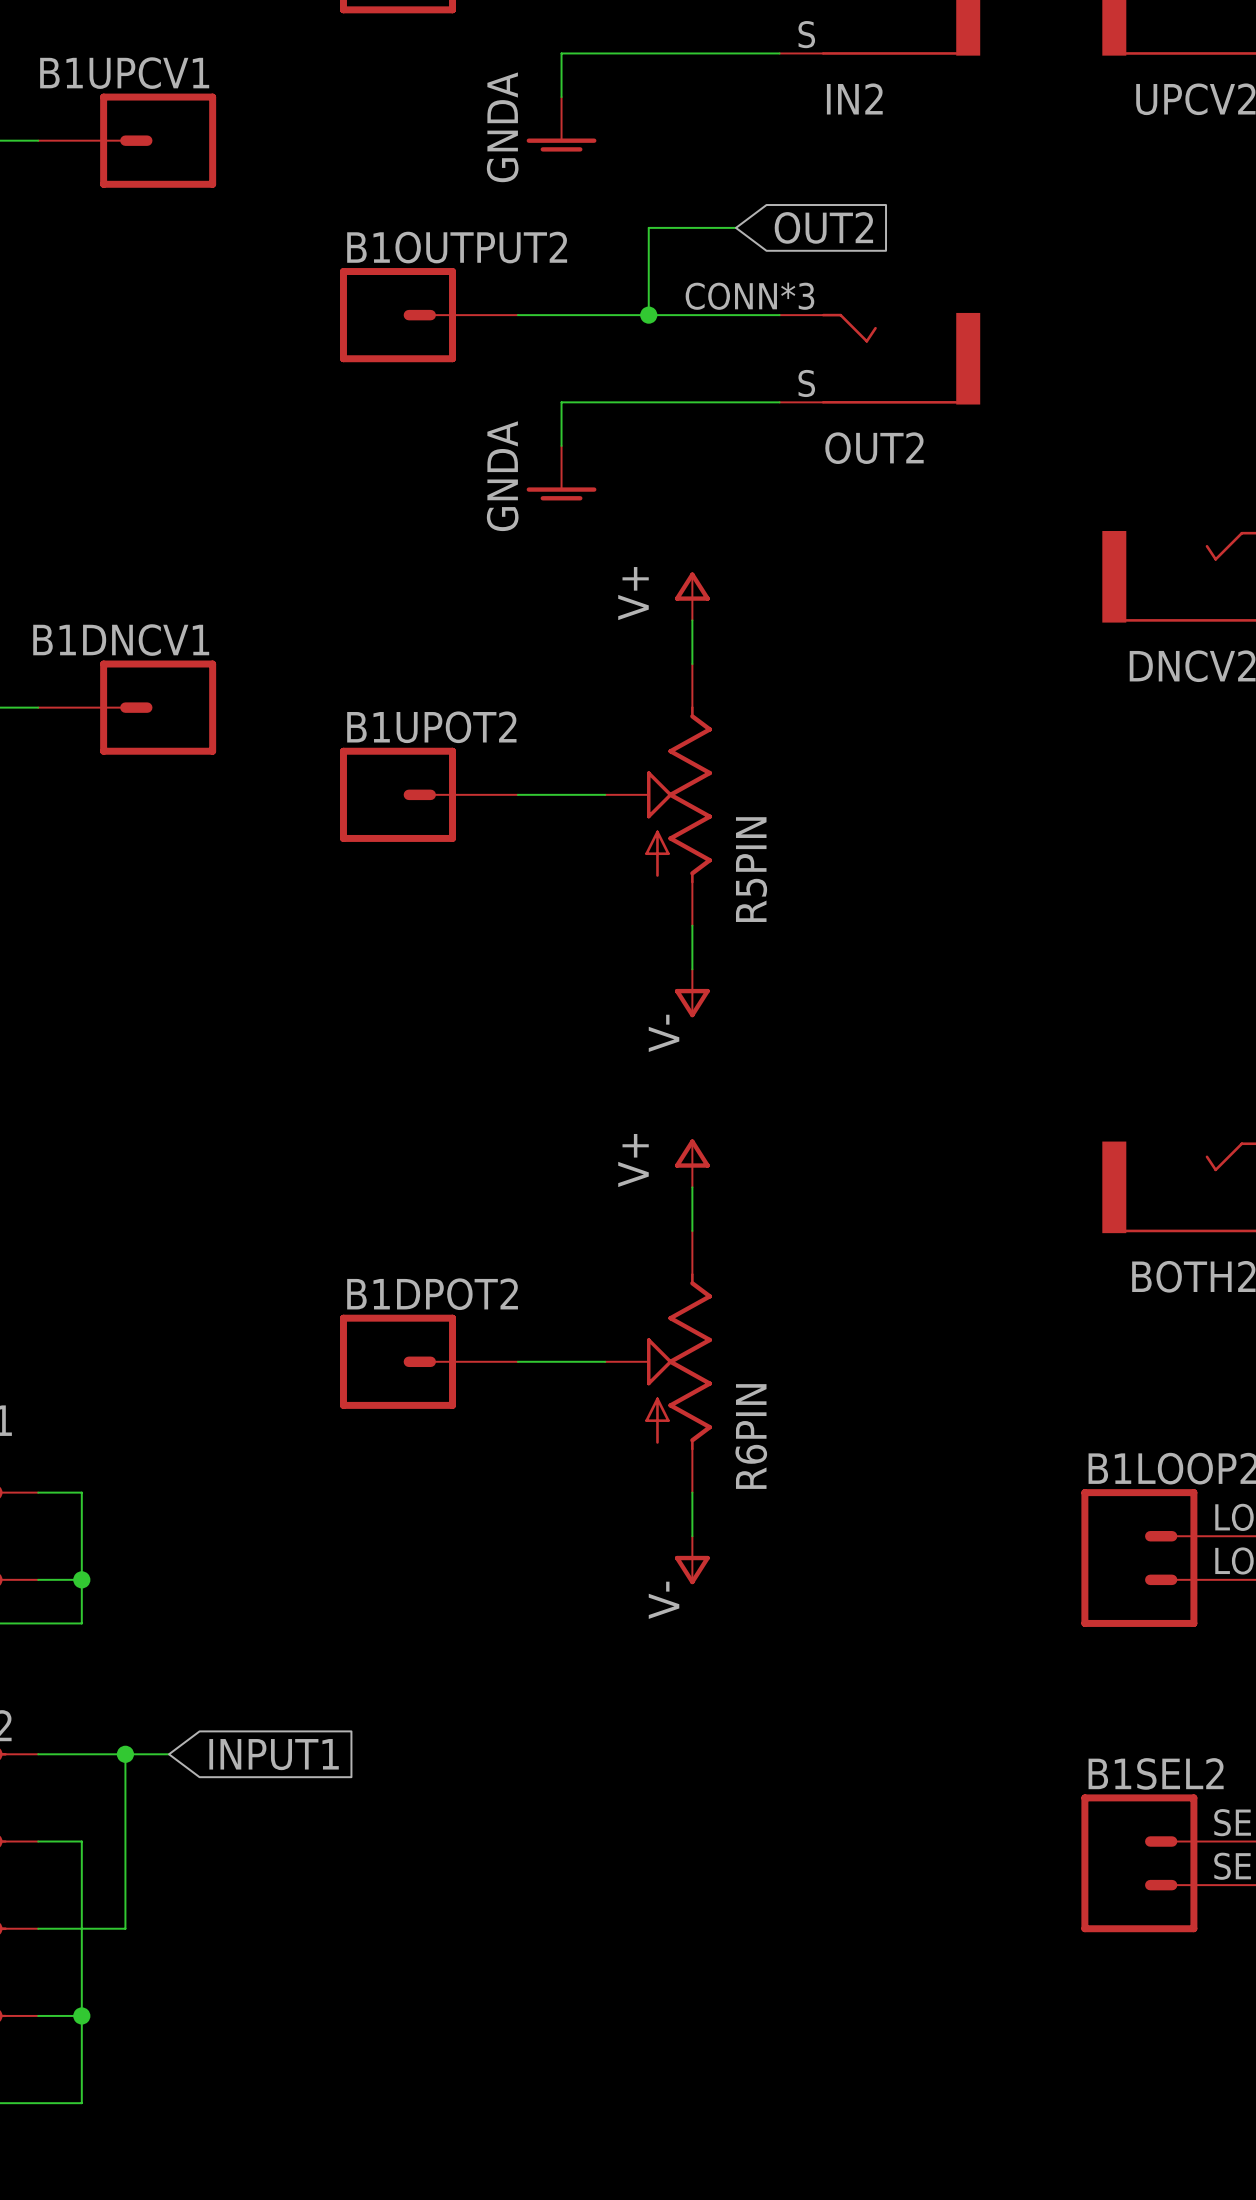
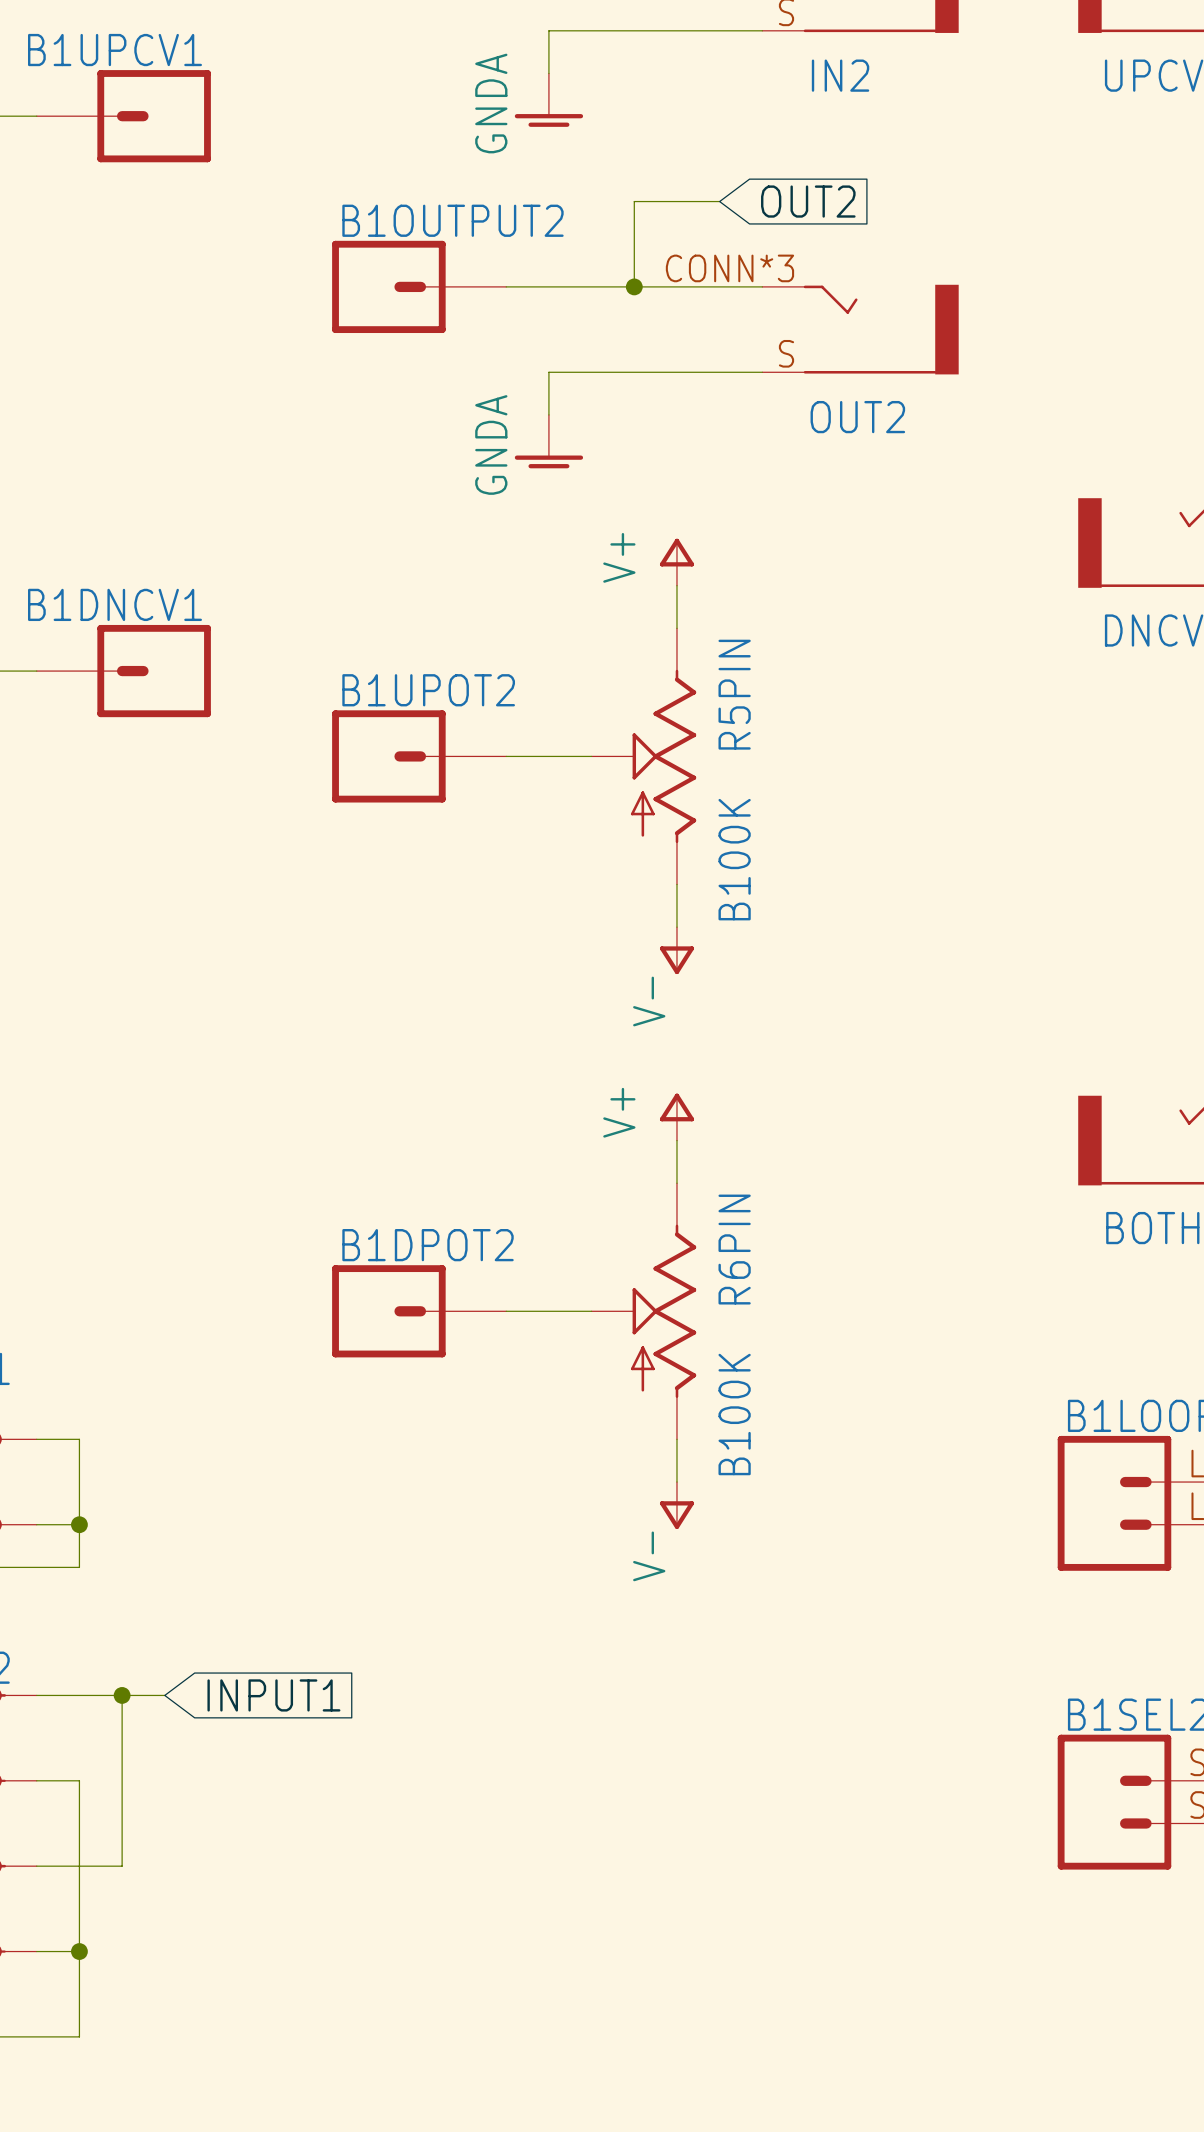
R5PIN name position: R5PIN (751, 869) -> R5PIN (734, 694)
R5PIN value: none -> B100K (734, 859)
R6PIN name position: R6PIN (751, 1436) -> R6PIN (734, 1249)
R6PIN value: none -> B100K (734, 1414)

